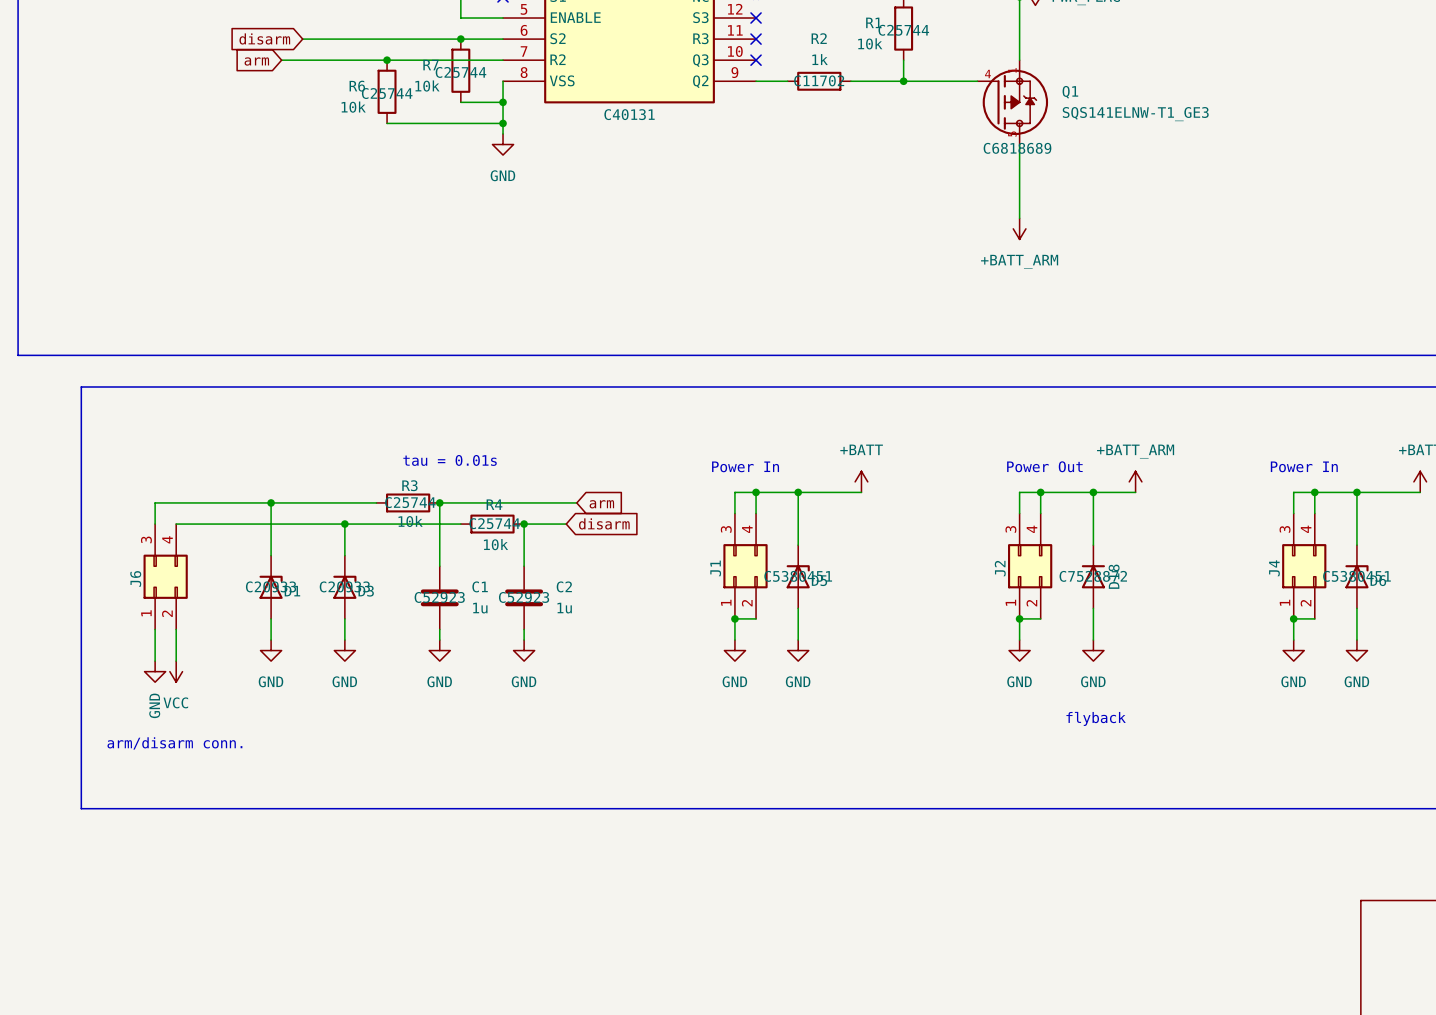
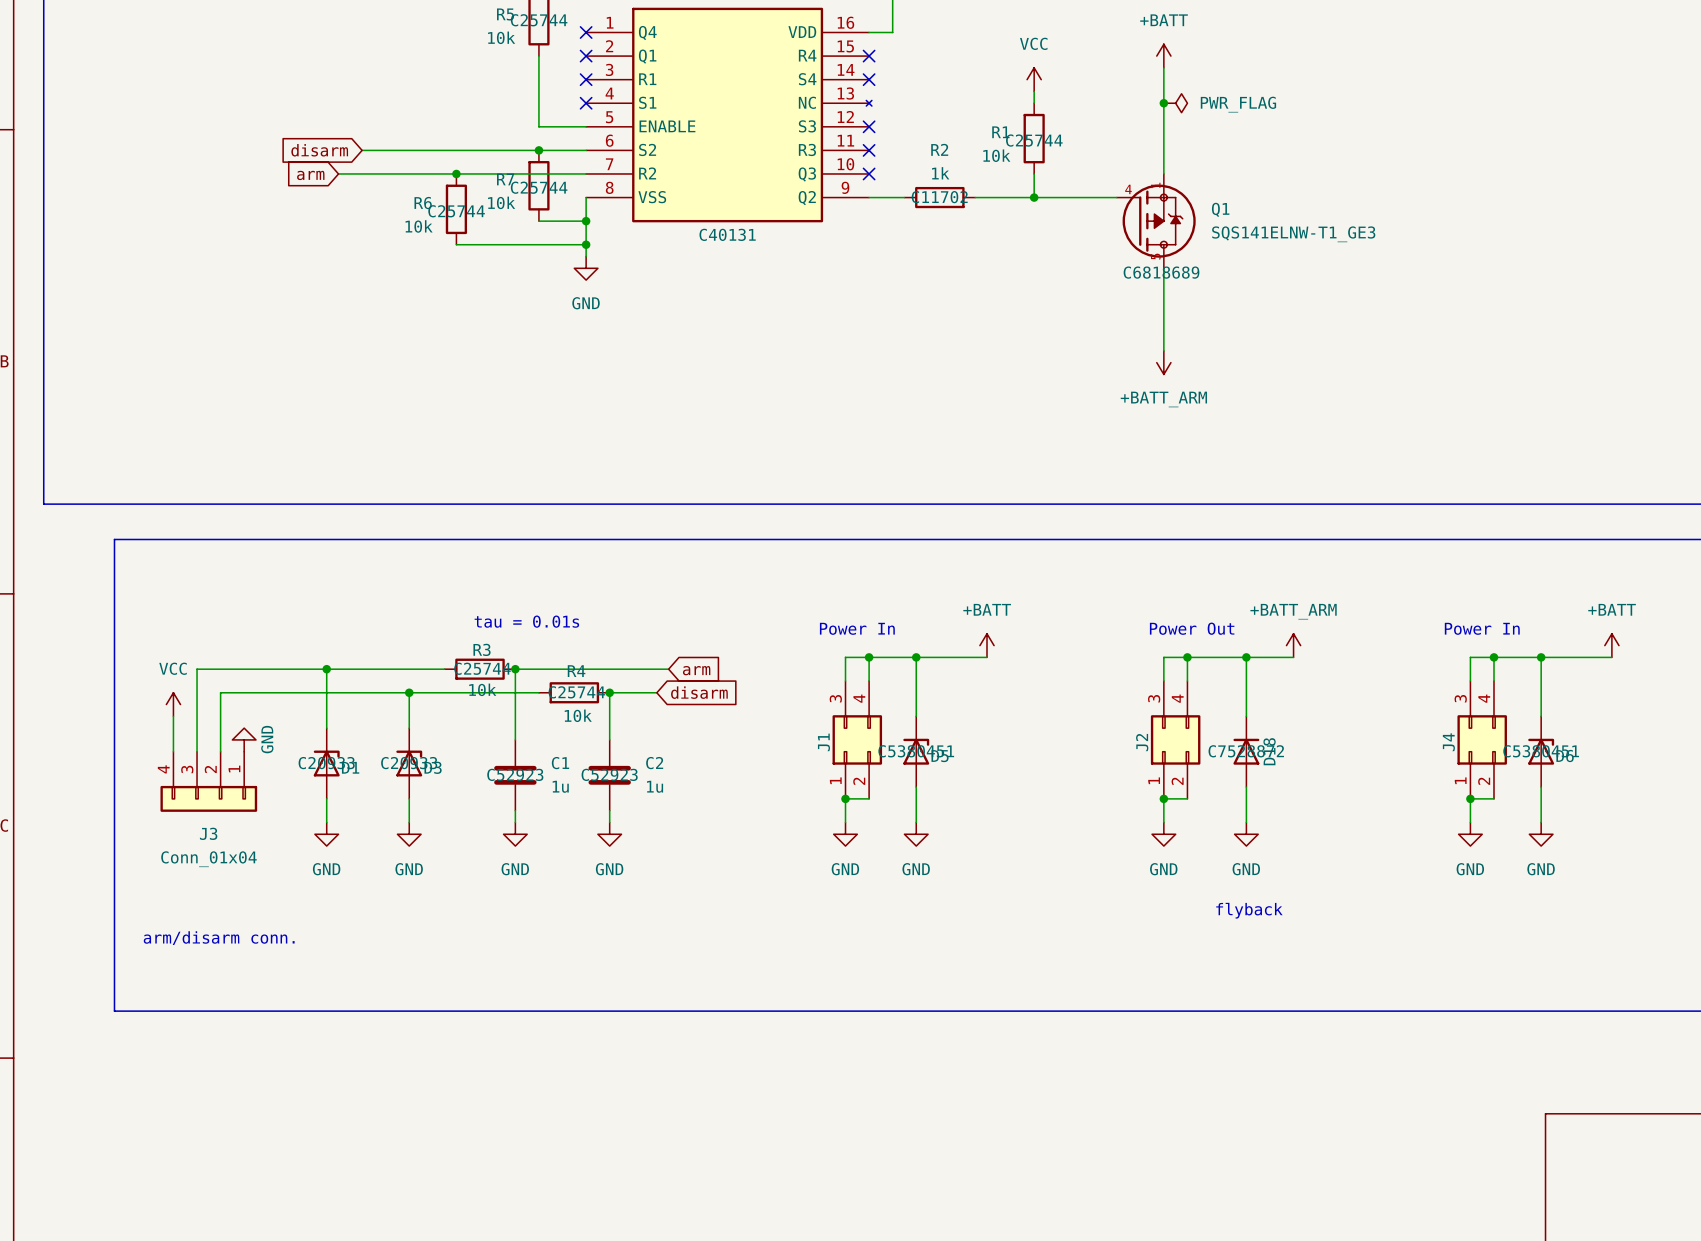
J6: (165, 576) -> none
J3: none -> Conn_01x04 (208, 781)
wire: (155, 629) (155, 661) -> (173, 716) (173, 751)
wire: (176, 629) (176, 661) -> none
power symbol rotation: 0° (155, 671) -> 180° (244, 739)
power symbol position: GND (155, 671) -> GND (244, 739)
power symbol rotation: 0° (176, 671) -> 180° (173, 704)
power symbol position: VCC (176, 671) -> VCC (173, 704)
power symbol text position: GND (154, 705) -> GND (267, 739)

